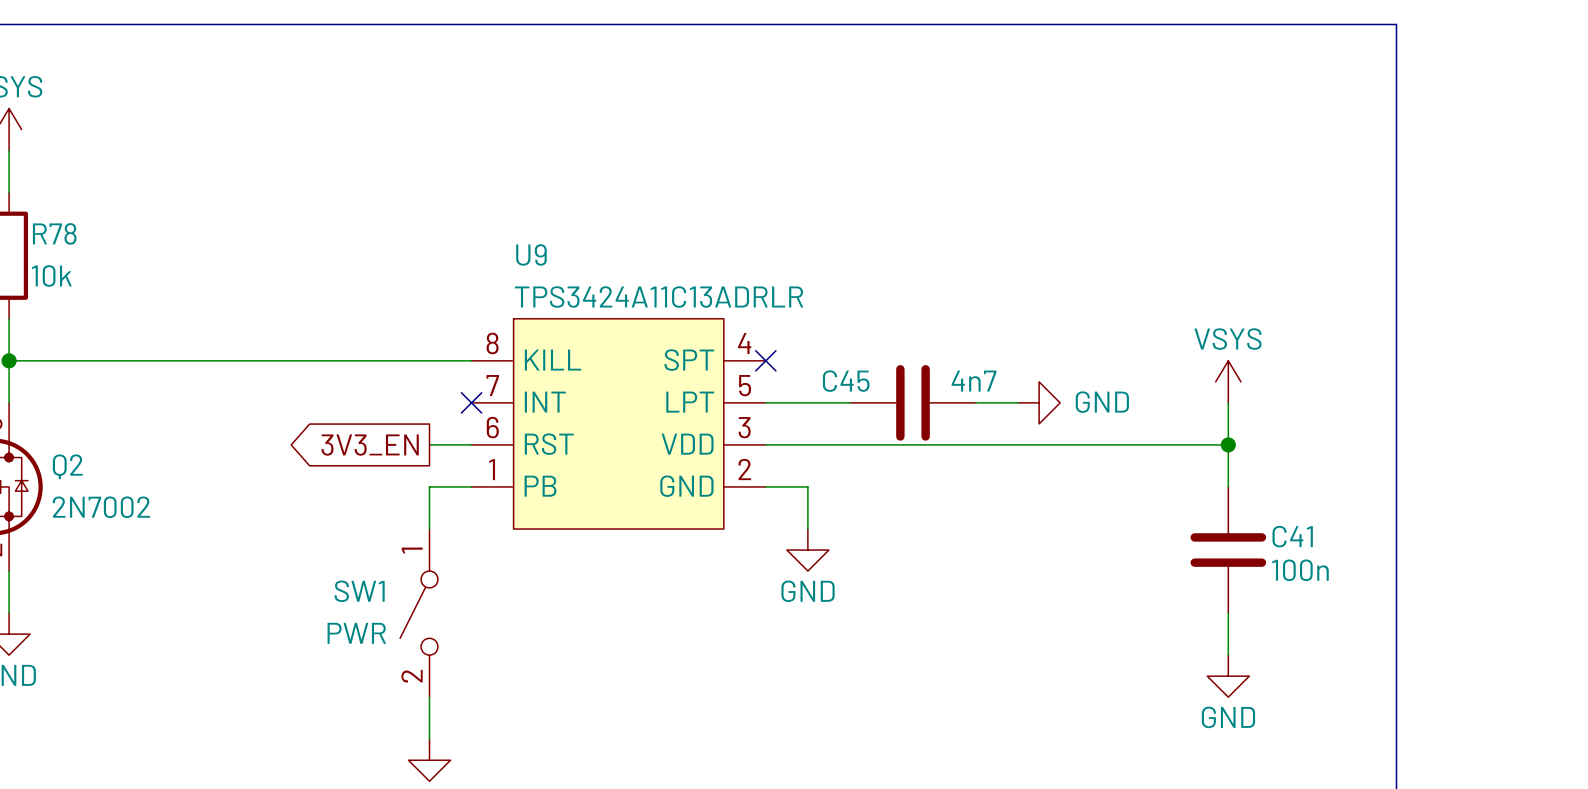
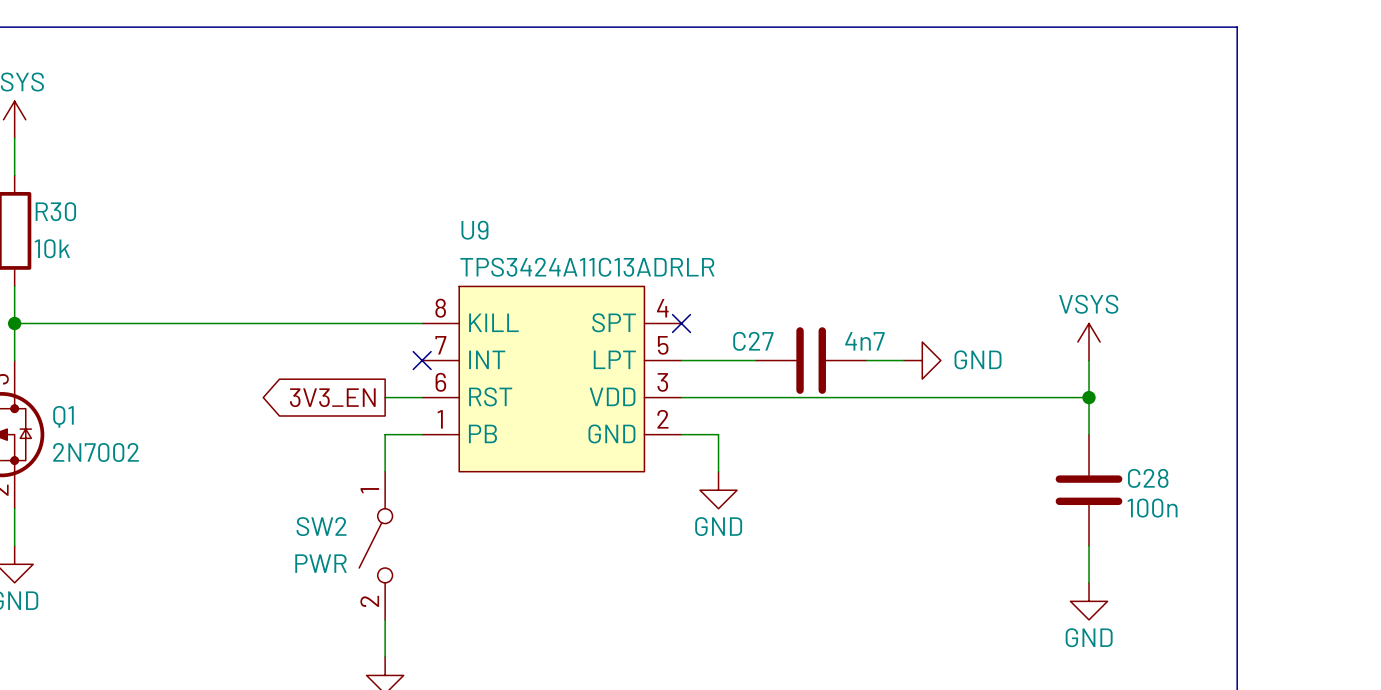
R78 name: R78 (54, 233) -> R30 (55, 211)
C45 name: C45 (846, 381) -> C27 (753, 341)
Q2 name: Q2 (67, 466) -> Q1 (63, 416)
C41 name: C41 (1292, 536) -> C28 (1148, 478)
SW1 name: SW1 (359, 591) -> SW2 (321, 526)

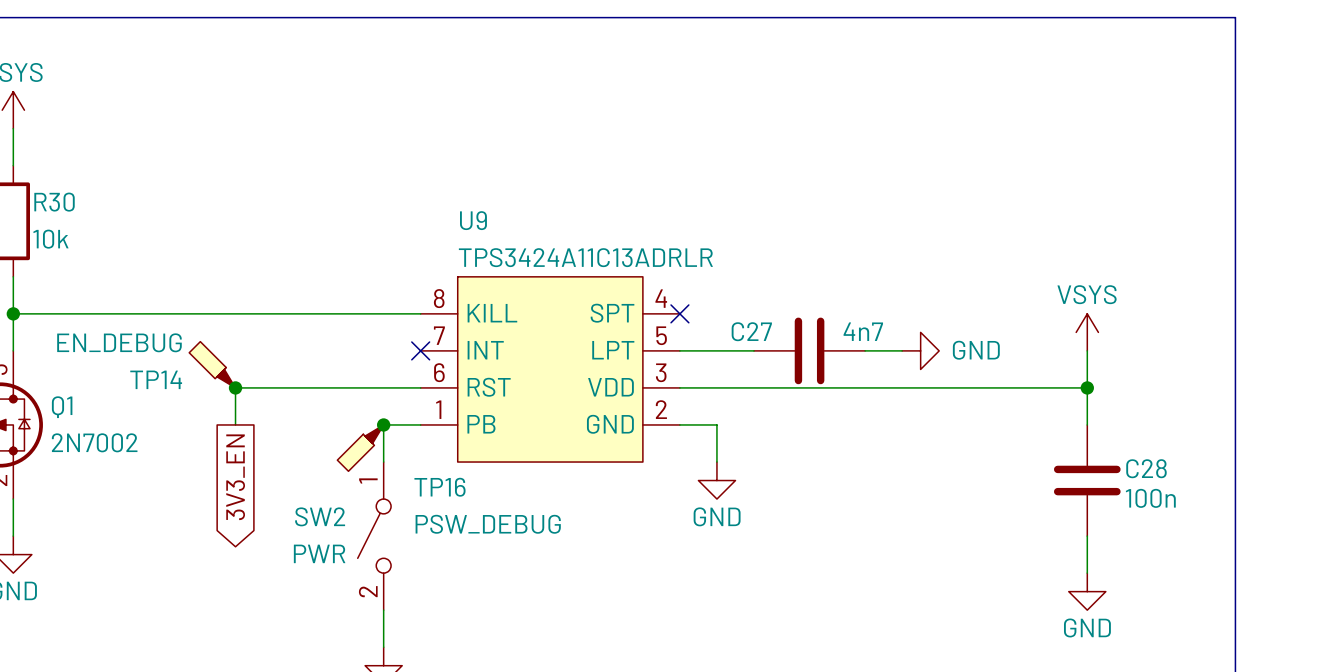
TP14: none -> EN_DEBUG (212, 364)
junction: none -> (235, 387)
global label rotation: 0° (332, 397) -> 90° counterclockwise (235, 477)
wire: none -> (383, 387) (235, 387) (235, 424)
junction: none -> (383, 424)
TP16: none -> PSW_DEBUG (360, 448)

